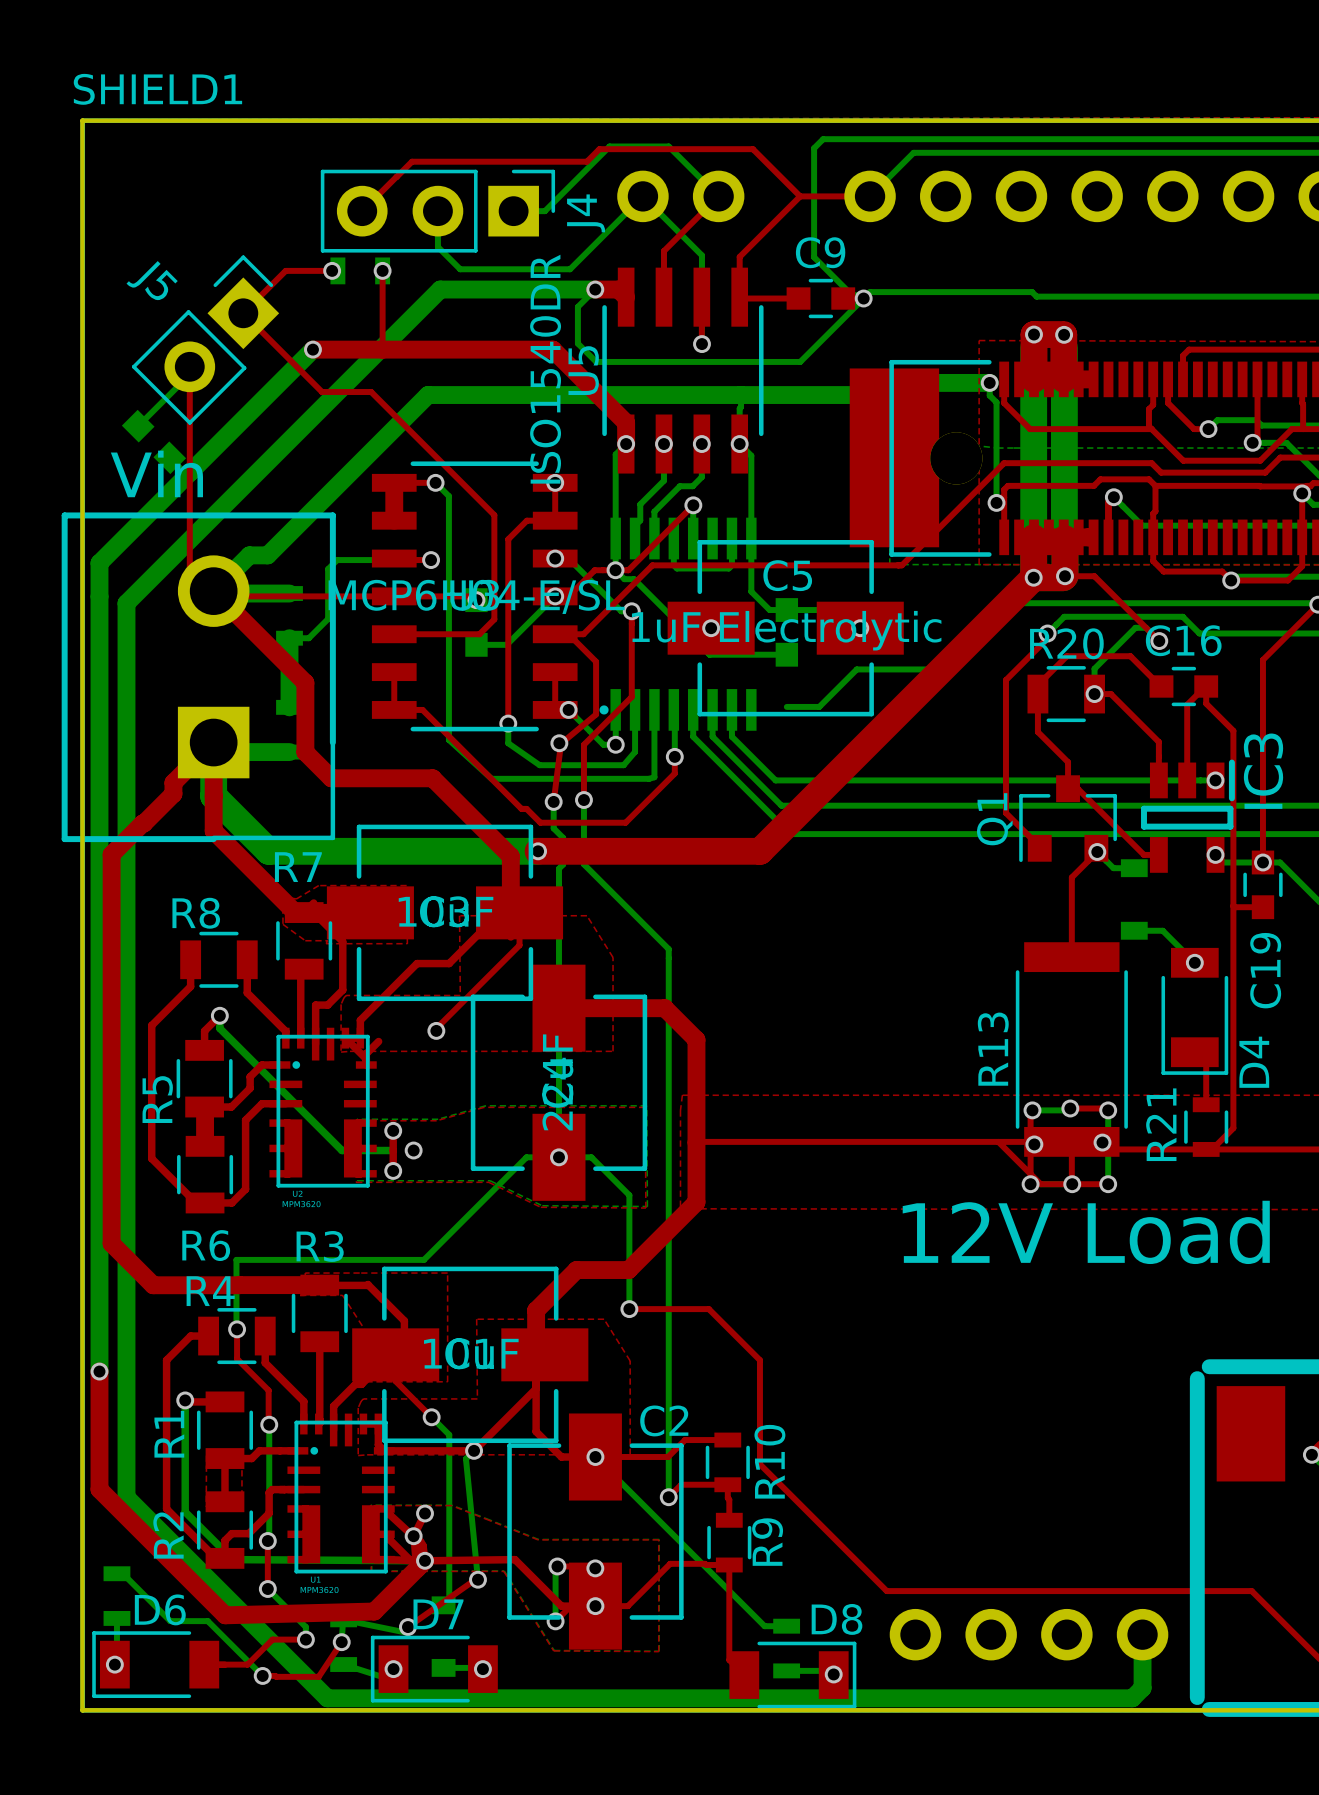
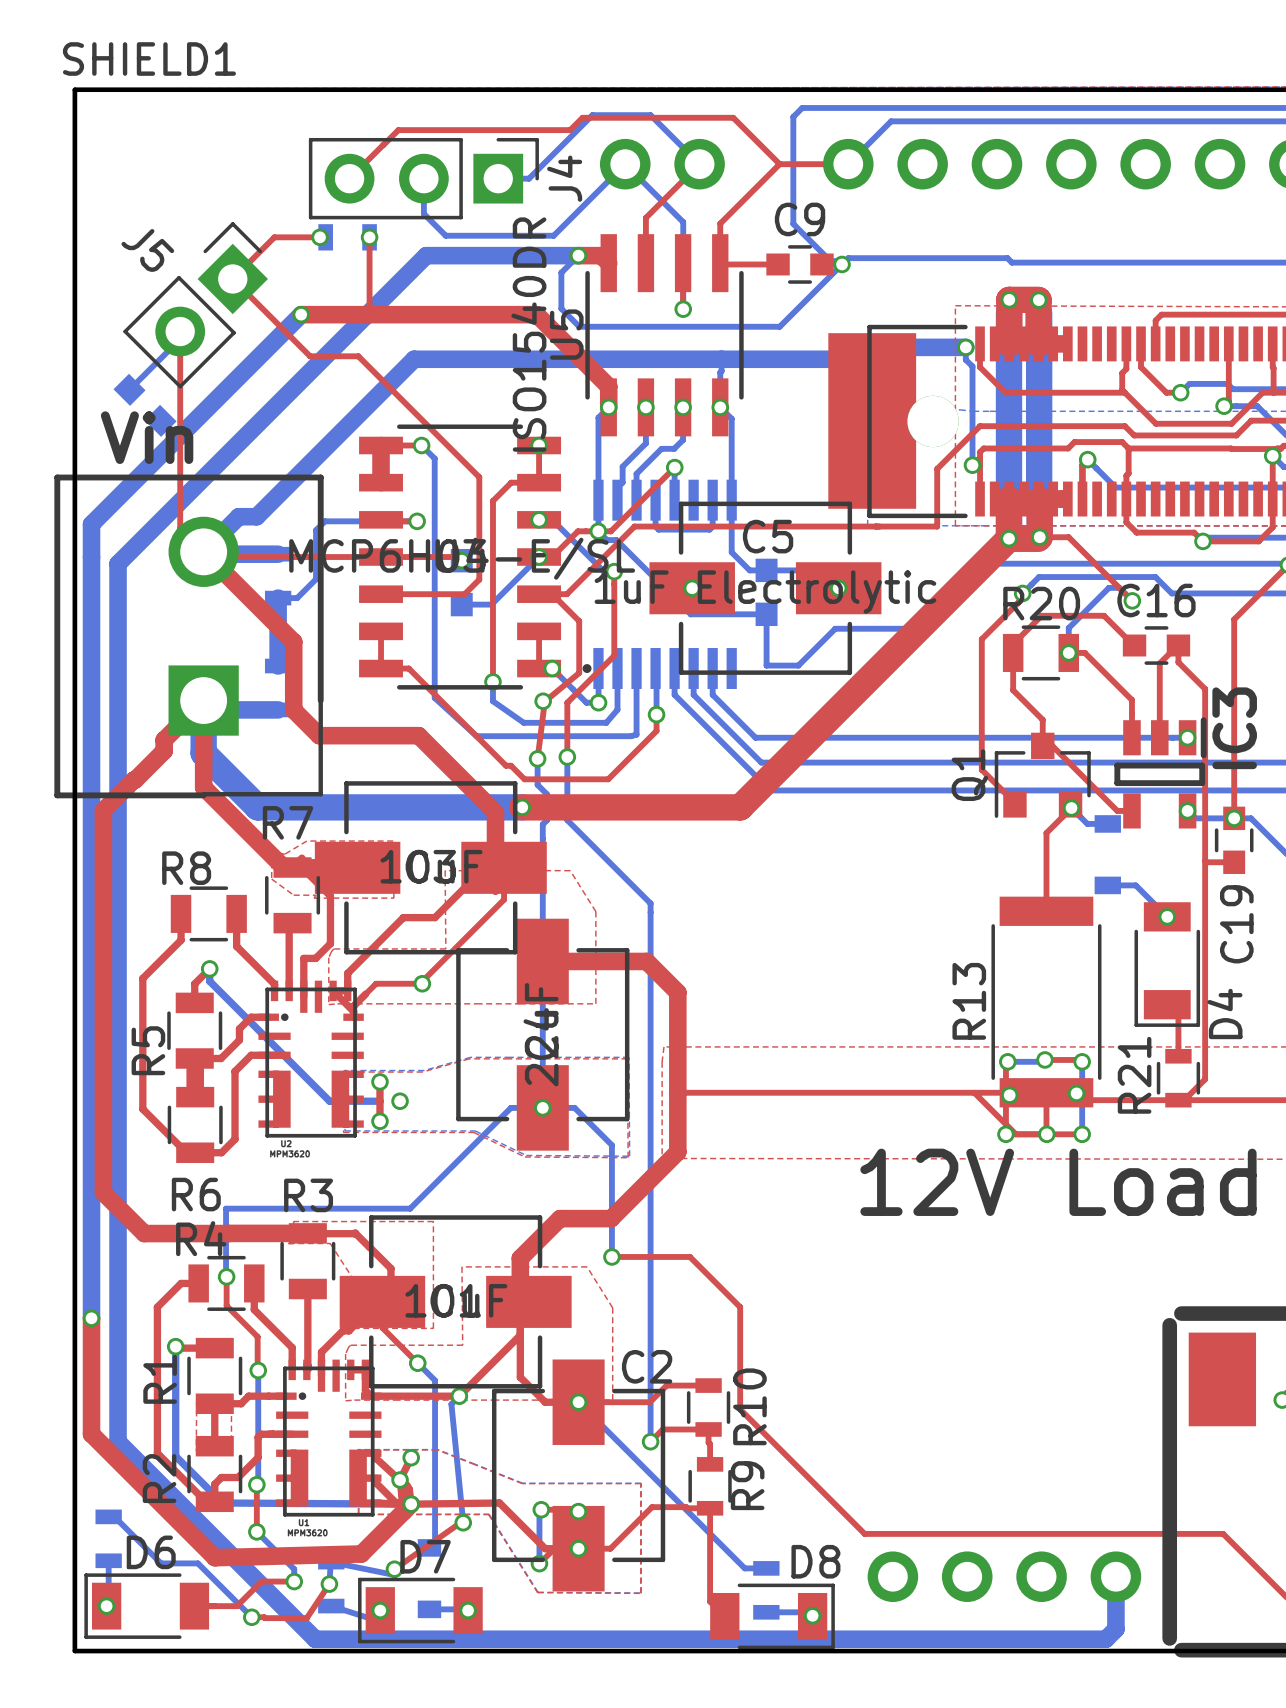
top track: (960, 506) (901, 565) -> (937, 468) (937, 526) (879, 526)
bottom track: none -> (766, 614) (766, 665)
top track: none -> (422, 983) (376, 983) (365, 994)

